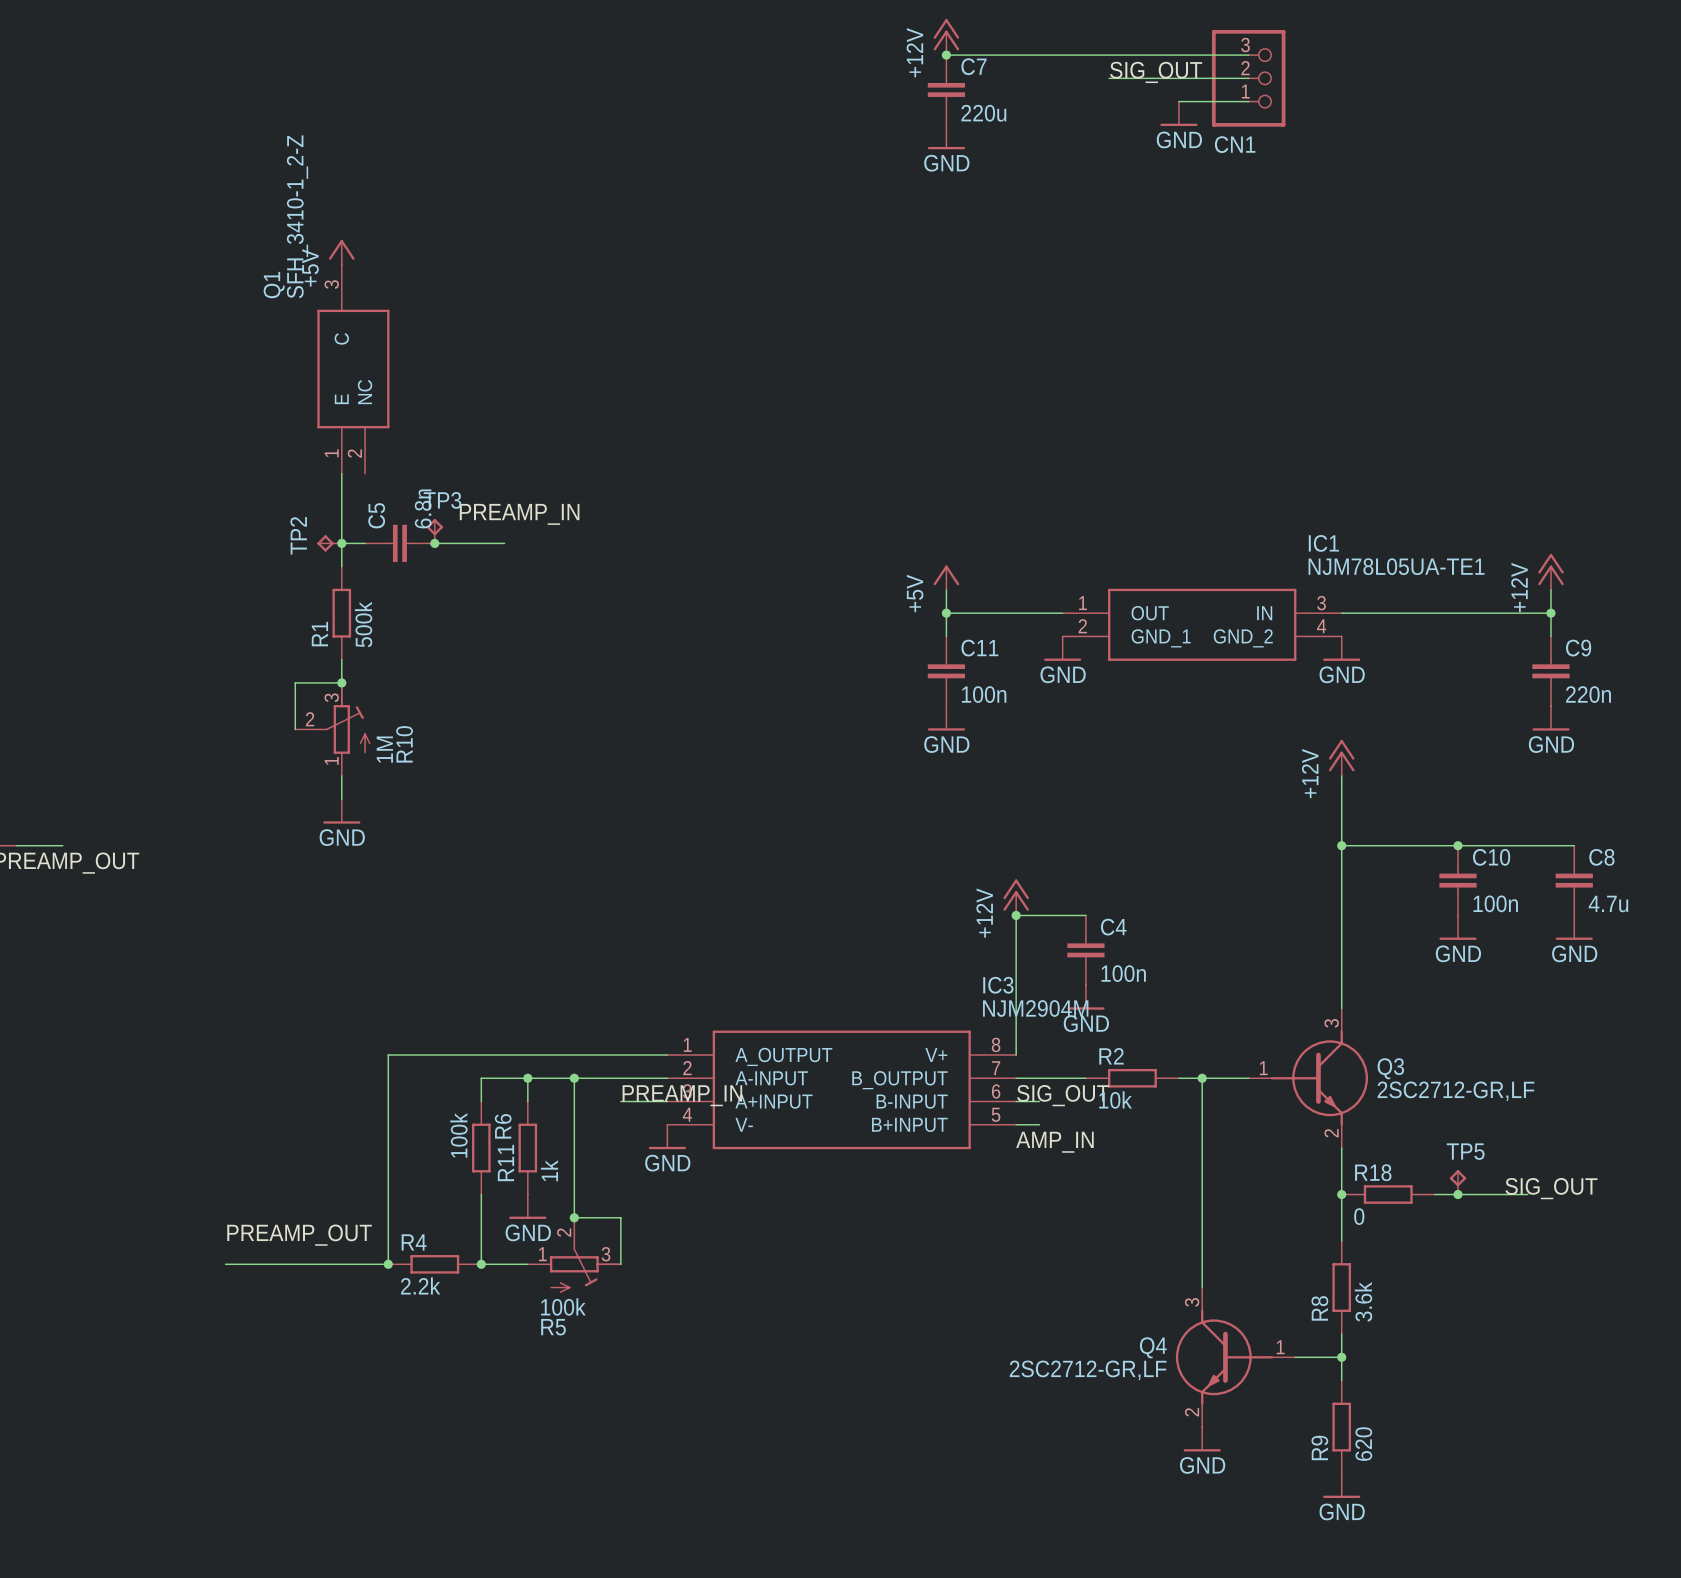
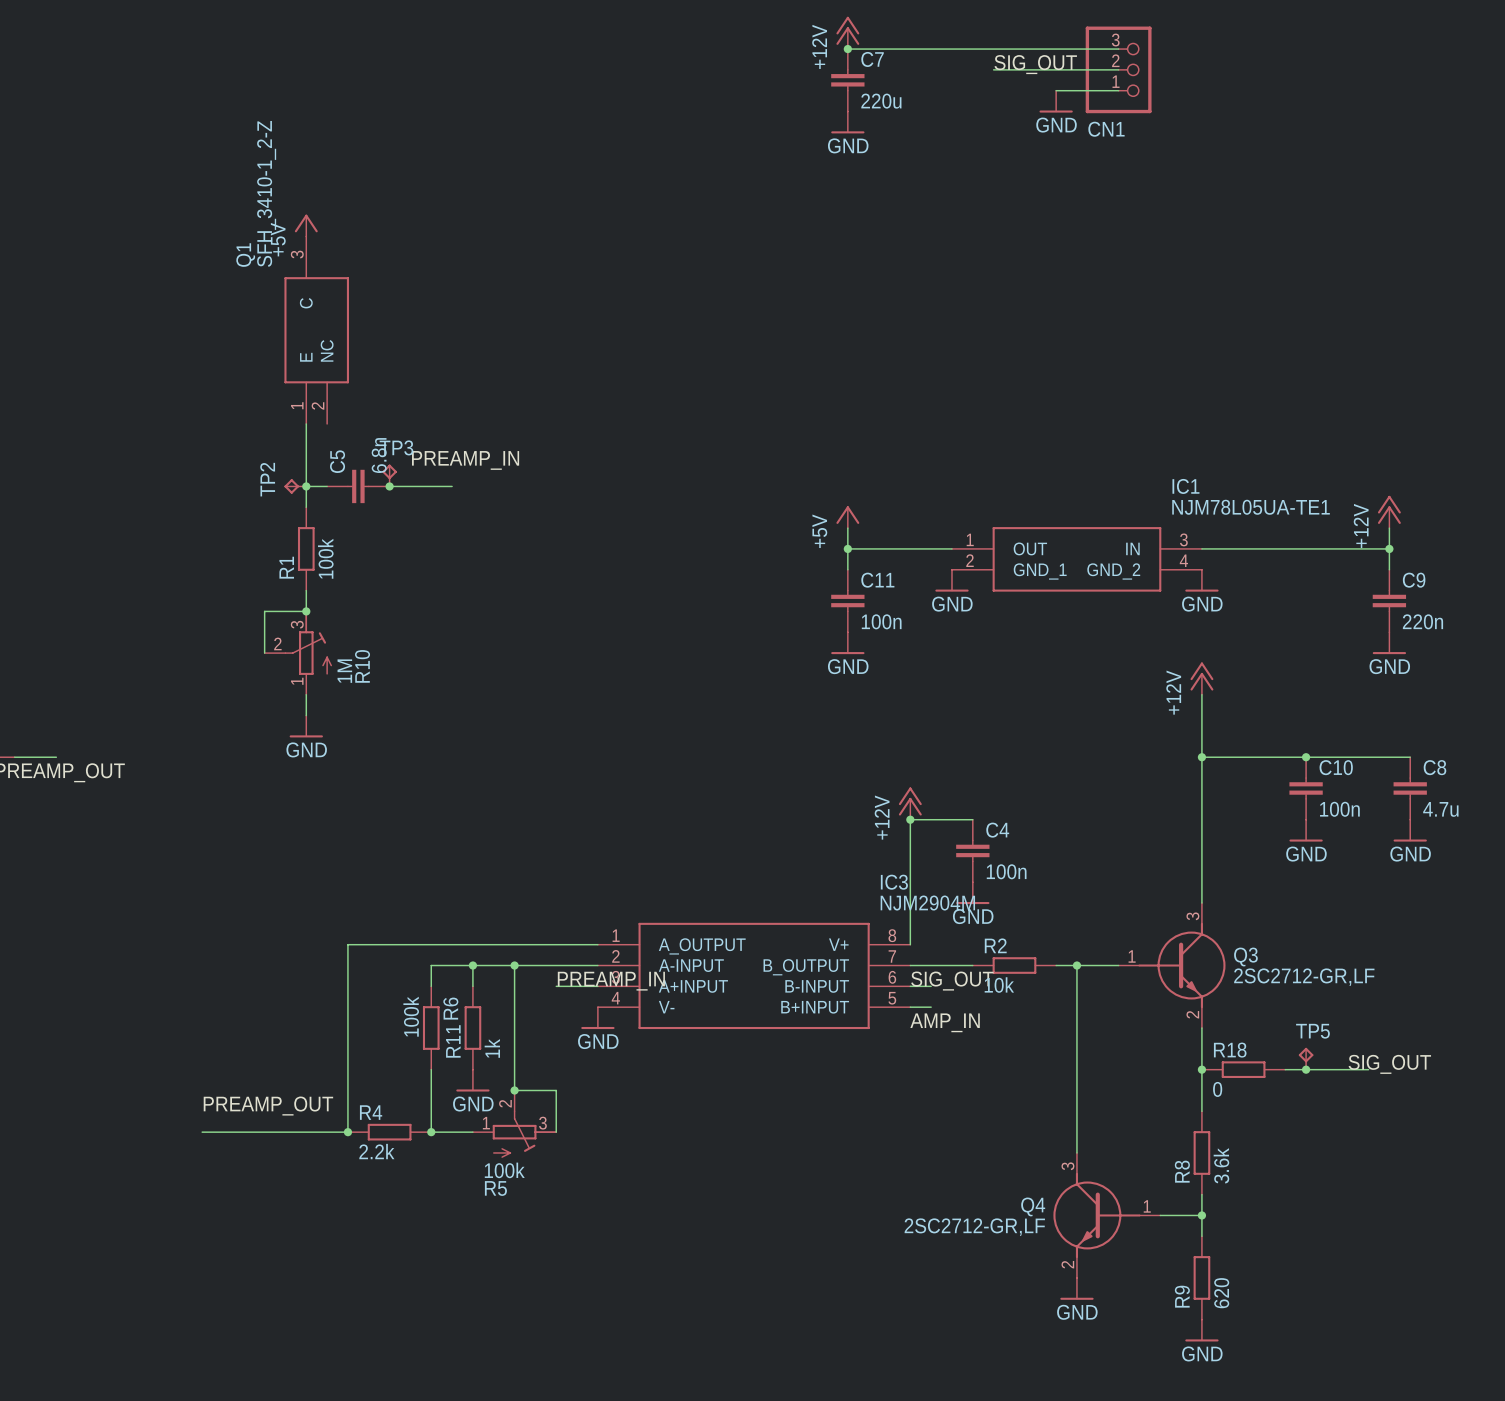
R1 value: 500k (363, 624) -> 100k (325, 558)

